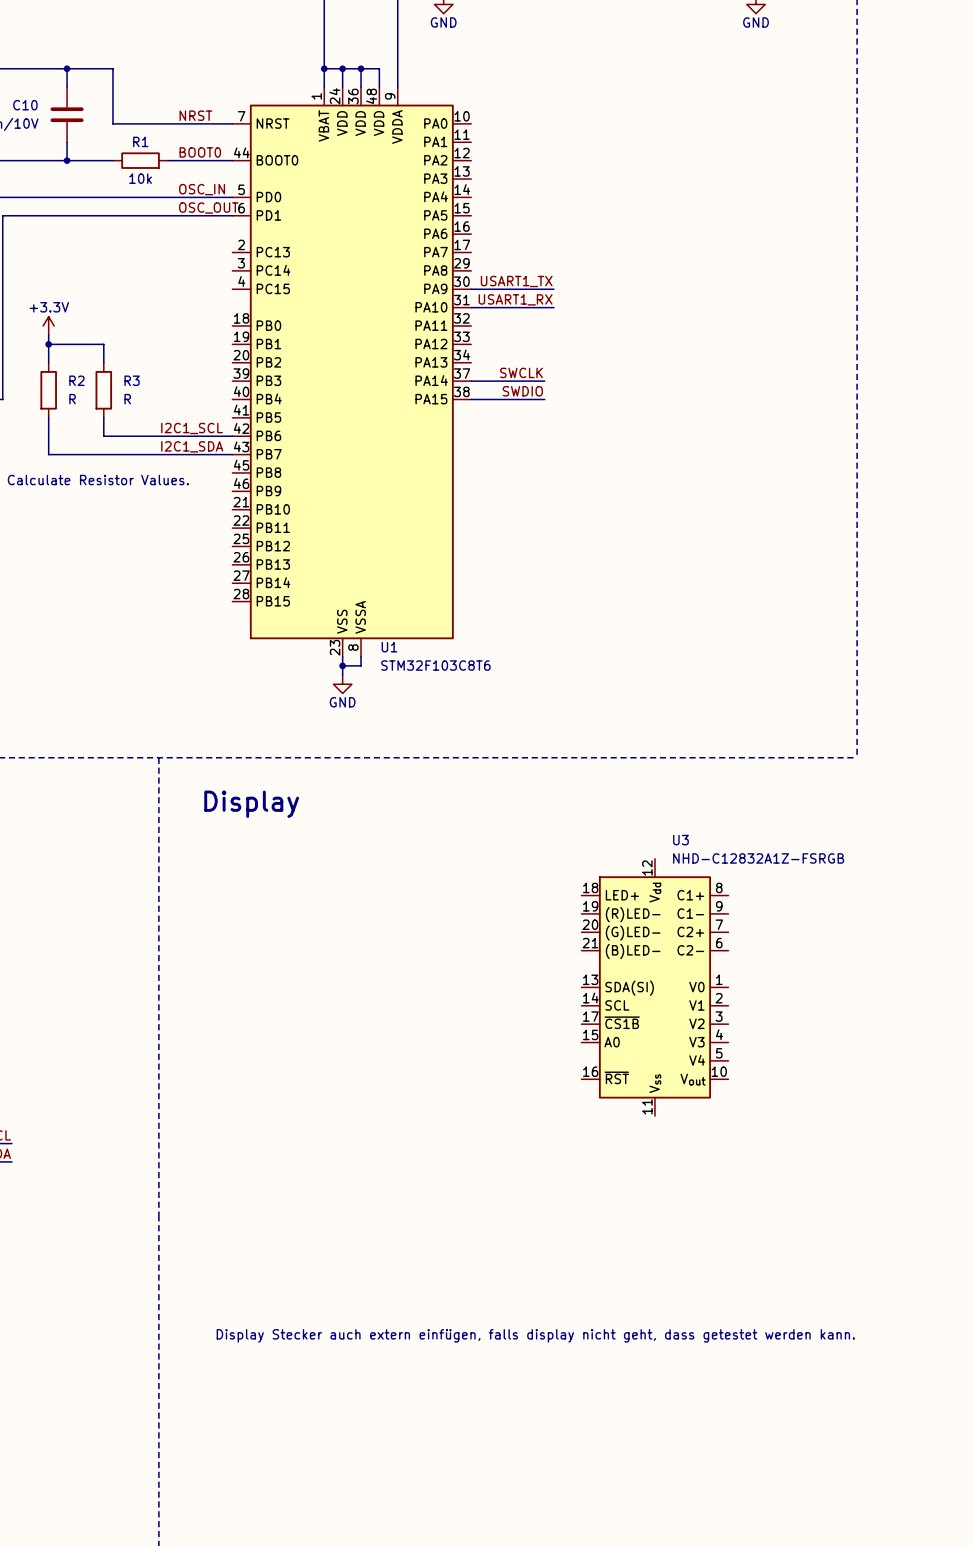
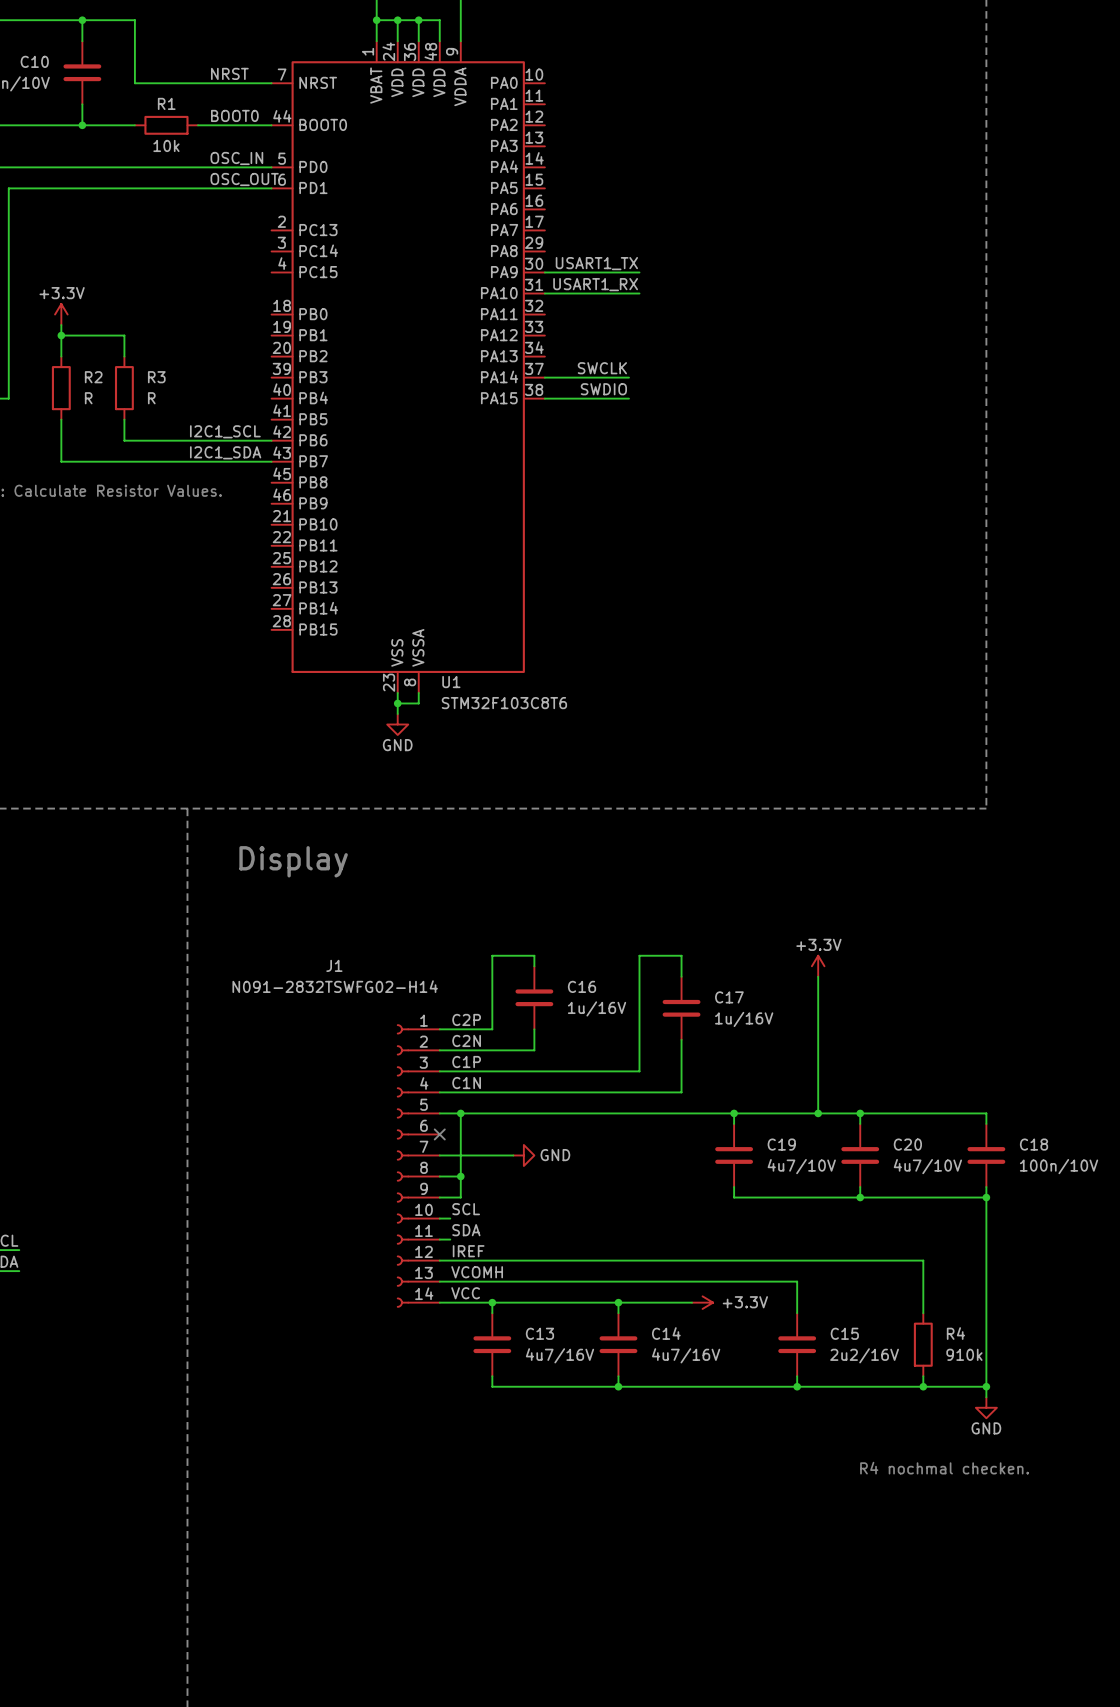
wire: none -> (534, 966) (534, 955) (492, 955) (492, 1029) (439, 1029)
power symbol: none -> +3.3V (818, 966)
wire: none -> (681, 976) (681, 955) (639, 955) (639, 1071) (439, 1071)
C16: none -> 1u/16V (534, 997)
C17: none -> 1u/16V (681, 1008)
label: none -> C2P (466, 1019)
wire: none -> (534, 1029) (534, 1050) (439, 1050)
wire: none -> (681, 1039) (681, 1092) (439, 1092)
label: none -> C2N (466, 1040)
label: none -> C1P (466, 1062)
U3: NHD-C12832A1Z-FSRGB (654, 987) -> none
label: none -> C1N (466, 1083)
wire: none -> (439, 1113) (986, 1113) (986, 1123)
wire: none -> (460, 1113) (460, 1197) (439, 1197)
junction: none -> (460, 1113)
junction: none -> (734, 1113)
junction: none -> (818, 1113)
wire: none -> (860, 1113) (860, 1123)
junction: none -> (860, 1113)
no-connect mark: none -> (439, 1134)
wire: none -> (439, 1155) (513, 1155)
power symbol: none -> GND (523, 1155)
C19: none -> 4u7/10V (734, 1155)
C20: none -> 4u7/10V (860, 1155)
C18: none -> 100n/10V (986, 1155)
J1: none -> N091-2832TSWFG02-H14 (418, 1165)
wire: none -> (439, 1176) (460, 1176)
junction: none -> (460, 1176)
wire: none -> (734, 1187) (734, 1197) (986, 1197)
wire: none -> (860, 1187) (860, 1197)
wire: none -> (986, 1187) (986, 1397)
junction: none -> (860, 1197)
junction: none -> (986, 1197)
label: none -> SCL (466, 1209)
wire: none -> (439, 1218) (450, 1218)
label: none -> SDA (466, 1230)
wire: none -> (439, 1239) (450, 1239)
label: none -> IREF (468, 1251)
wire: none -> (439, 1260) (923, 1260) (923, 1313)
label: none -> VCOMH (477, 1272)
wire: none -> (439, 1281) (797, 1281) (797, 1313)
label: none -> VCC (465, 1293)
wire: none -> (439, 1302) (692, 1302)
wire: none -> (492, 1302) (492, 1313)
junction: none -> (492, 1302)
wire: none -> (618, 1302) (618, 1313)
junction: none -> (618, 1302)
power symbol: none -> +3.3V (702, 1302)
C13: none -> 4u7/16V (492, 1344)
C14: none -> 4u7/16V (618, 1344)
C15: none -> 2u2/16V (797, 1344)
R4: none -> 910k (923, 1344)
wire: none -> (492, 1376) (492, 1386) (986, 1386)
wire: none -> (618, 1376) (618, 1386)
wire: none -> (797, 1376) (797, 1386)
wire: none -> (923, 1376) (923, 1386)
junction: none -> (618, 1386)
junction: none -> (797, 1386)
junction: none -> (923, 1386)
junction: none -> (986, 1386)
power symbol: none -> GND (986, 1407)
text: none -> R4 nochmal checken. (944, 1468)
text: Display Stecker auch extern einfügen, falls display nicht geht, dass getestet werden kann. (535, 1335) -> none

